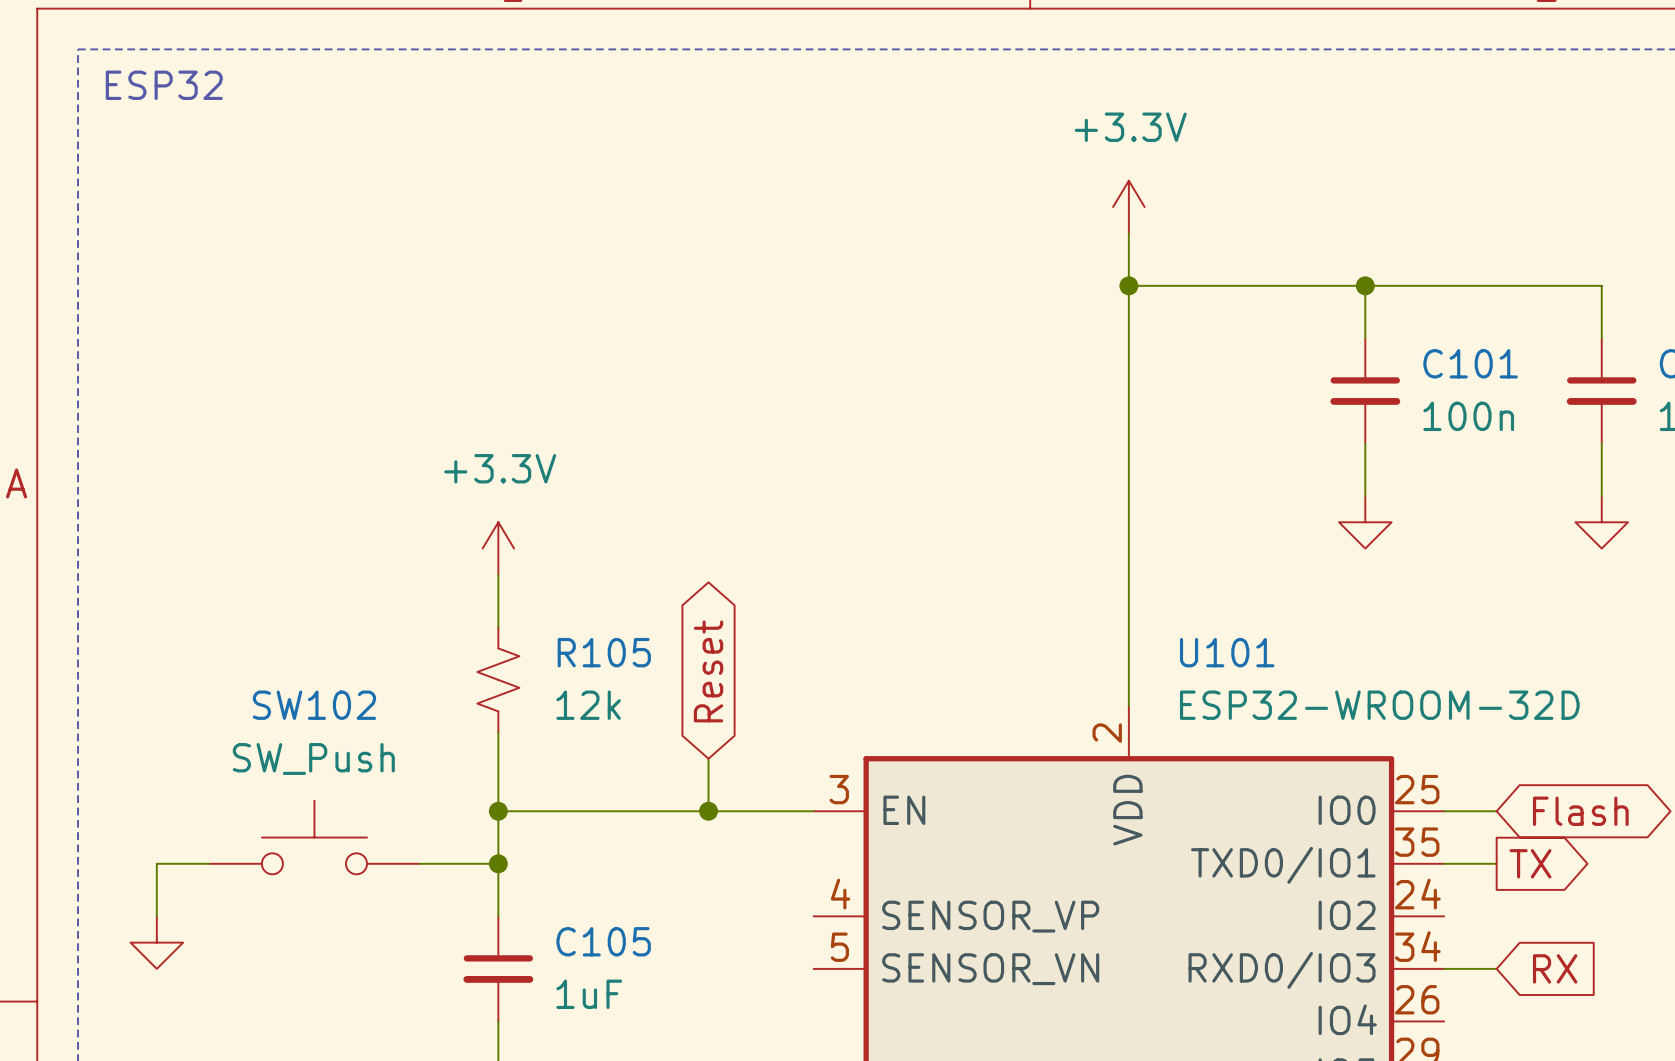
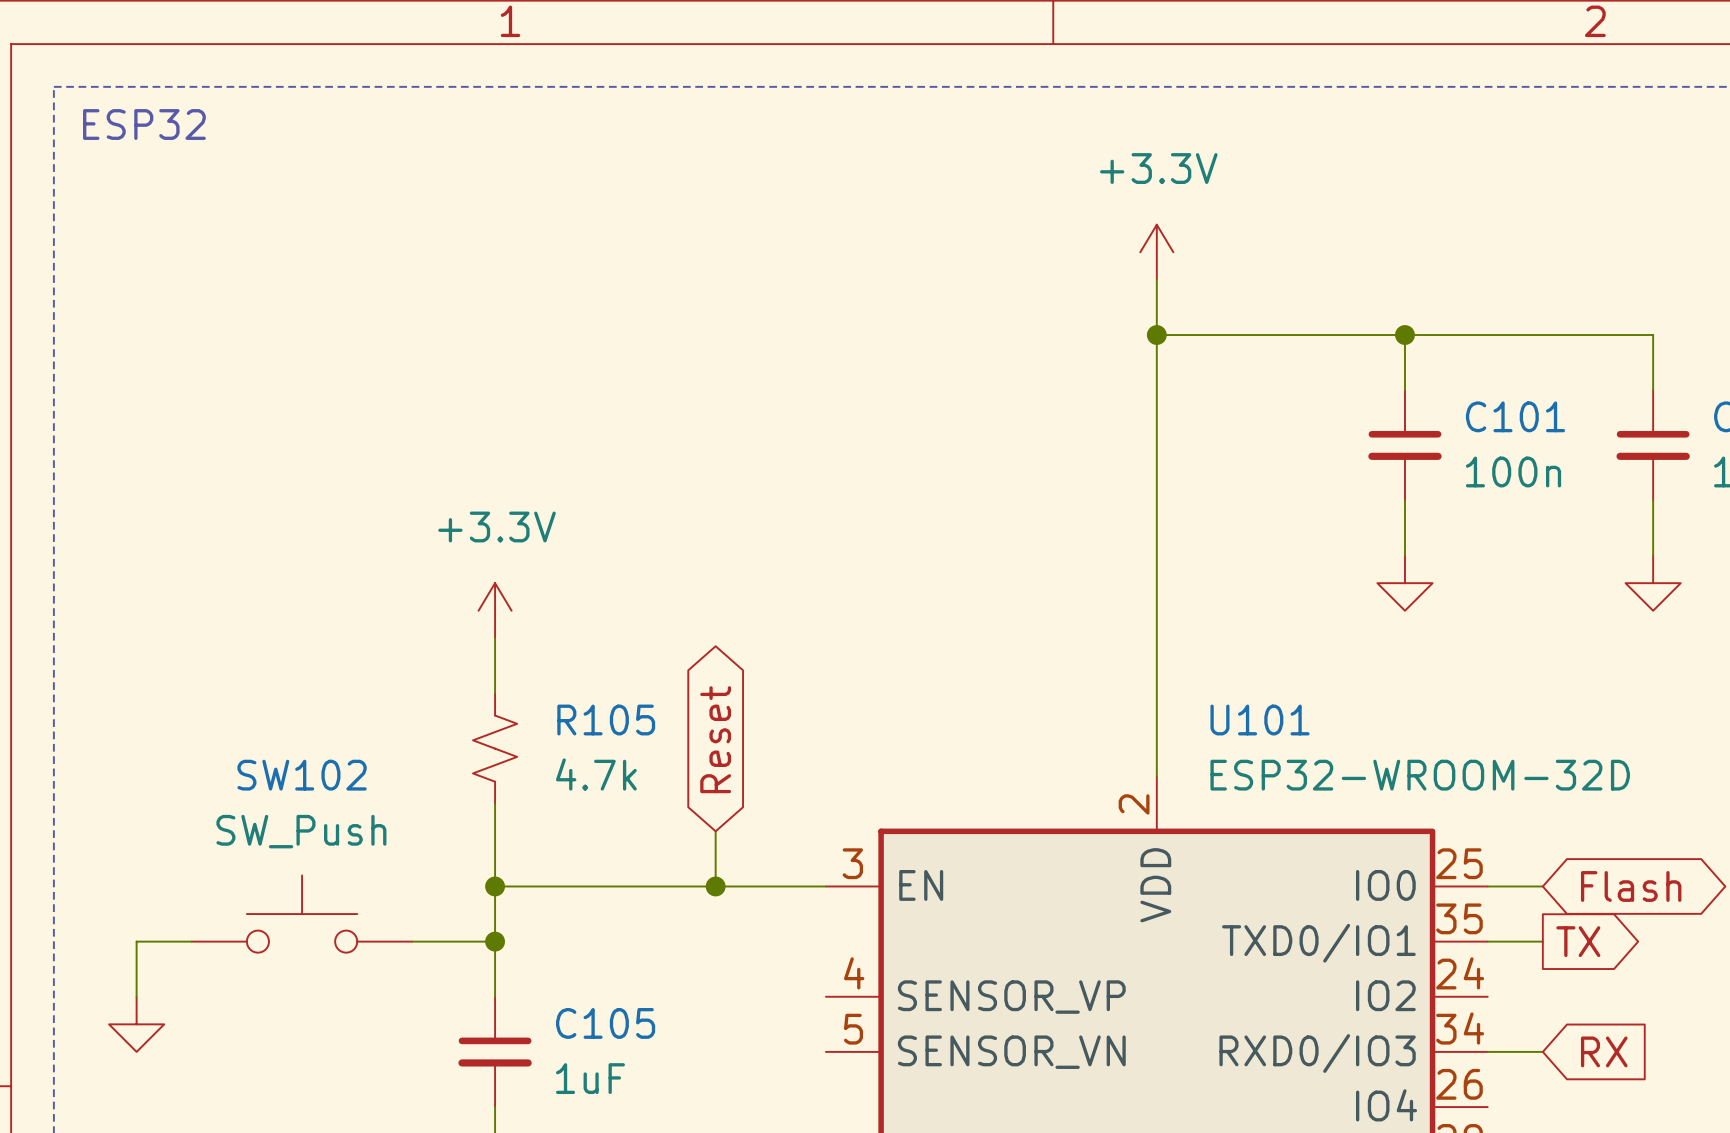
R105 value: 12k (588, 705) -> 4.7k (596, 774)

